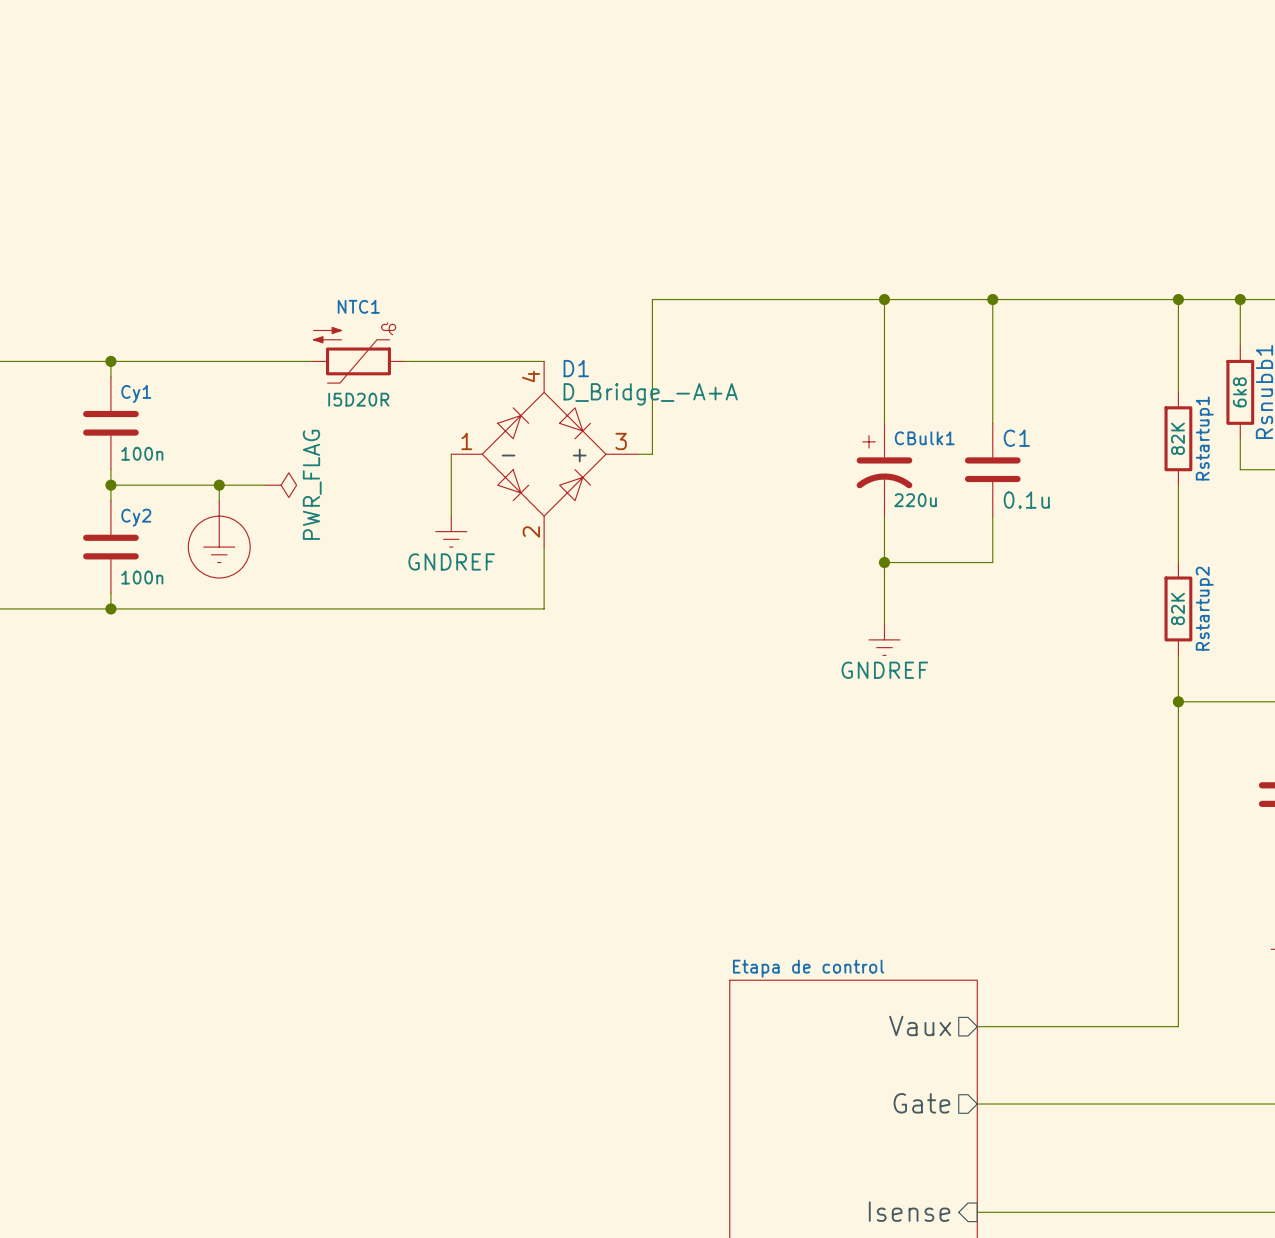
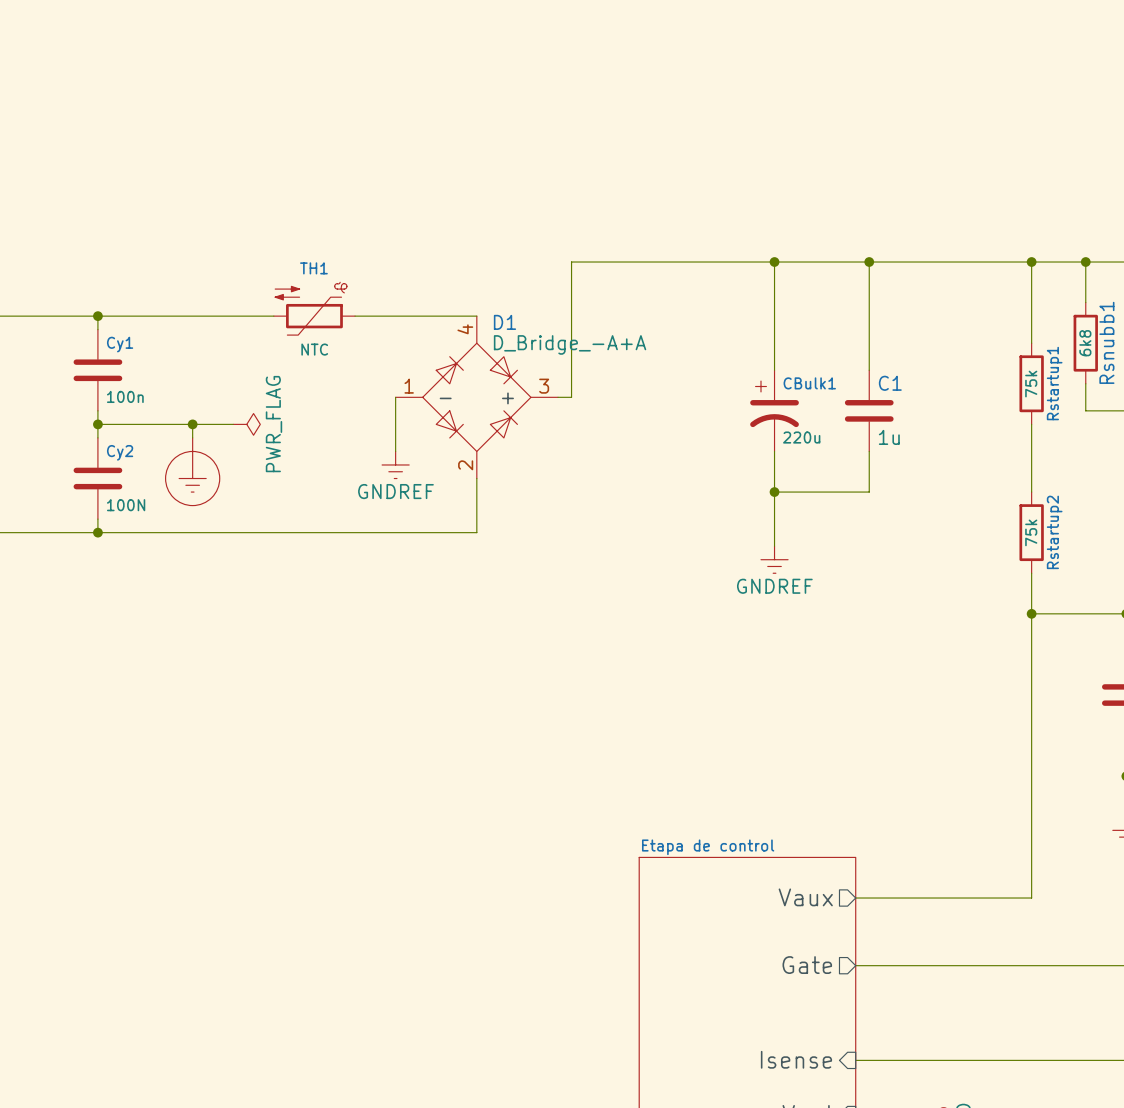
NTC1 name: NTC1 (358, 306) -> TH1 (313, 268)
NTC1 value: I5D20R (358, 399) -> NTC (314, 349)
Rstartup1 value: 82K (1177, 438) -> 75k (1031, 384)
C1 value: 0.1u (1026, 500) -> 1u (889, 437)
Cy2 value: 100n (142, 577) -> 100N (126, 505)
Rstartup2 value: 82K (1177, 608) -> 75k (1031, 532)

